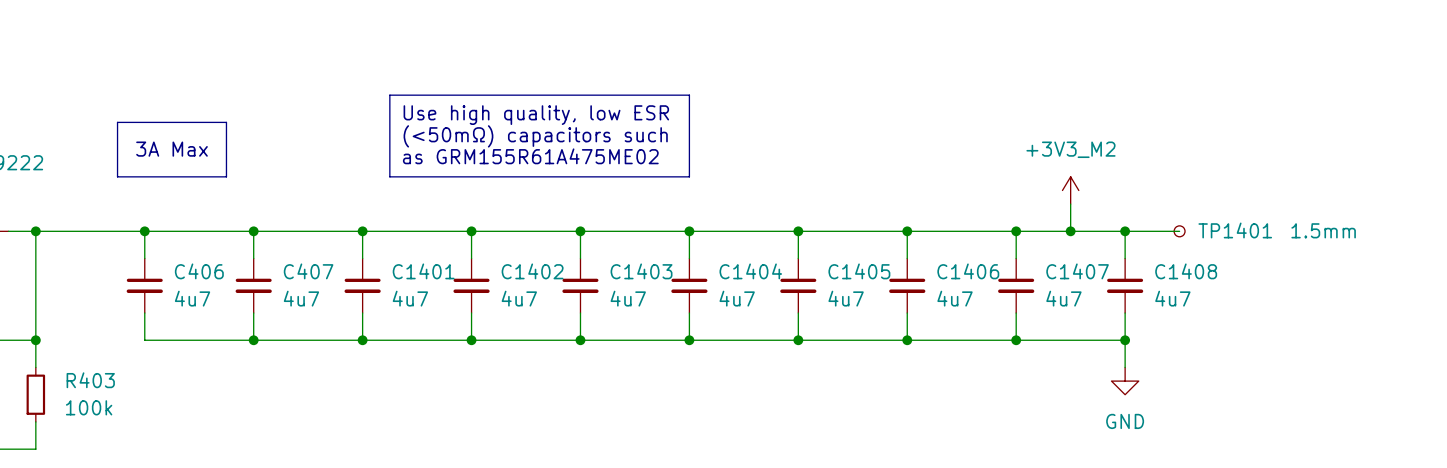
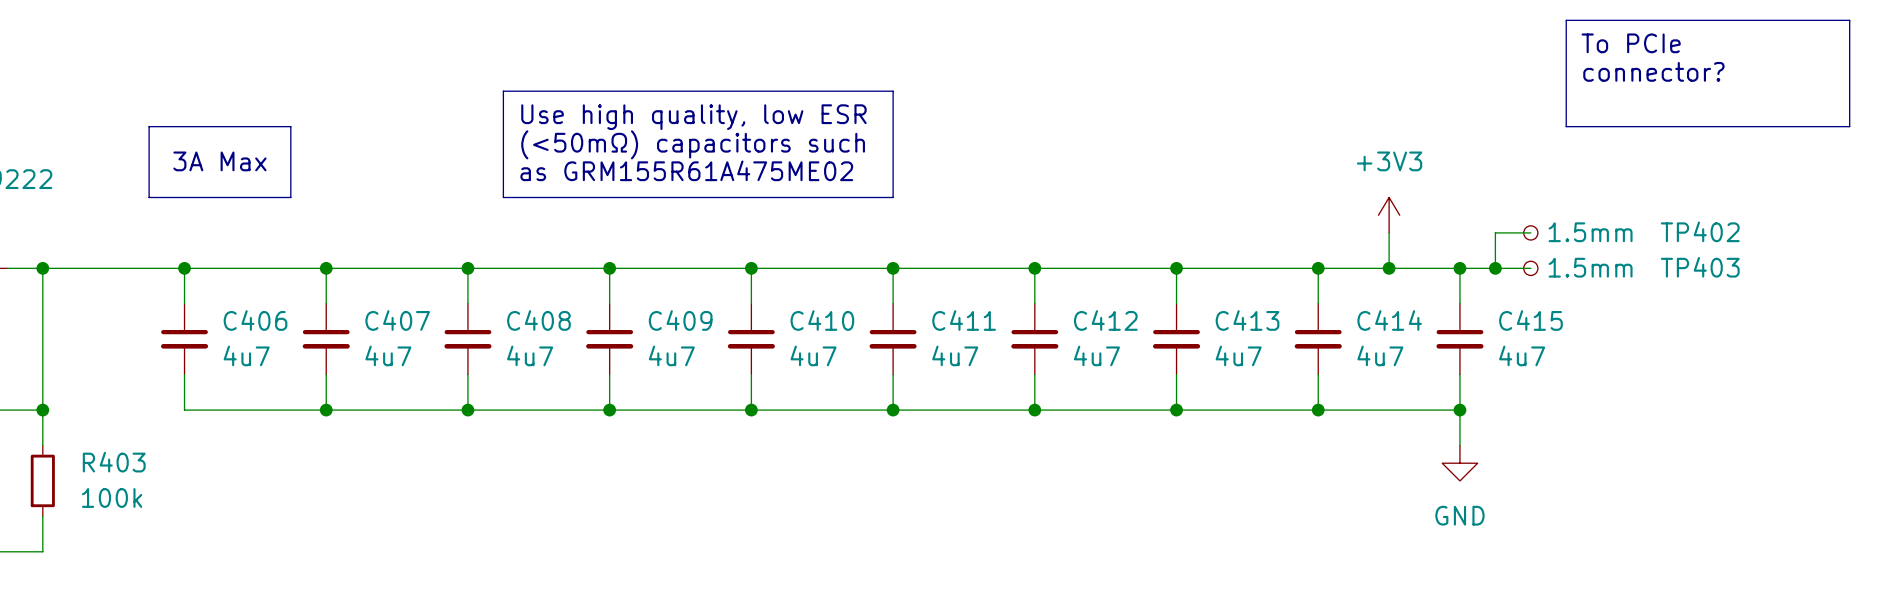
line: none -> (1566, 20) (1849, 20) (1849, 126) (1566, 126) (1566, 20)
text: none -> To PCIe (1631, 43)
text: none -> connector? (1653, 71)
power symbol: +3V3_M2 (1070, 190) -> +3V3 (1389, 215)
wire: none -> (1530, 232) (1495, 232) (1495, 268)
TP402: none -> 1.5mm (1530, 232)
TP1401 name: TP1401 (1235, 230) -> TP403 (1700, 267)
TP1401 value position: 1.5mm (1323, 230) -> 1.5mm (1590, 267)
junction: none -> (1495, 268)
C1401 name: C1401 (423, 271) -> C408 (538, 320)
C1402 name: C1402 (532, 271) -> C409 (680, 320)
C1403 name: C1403 (641, 271) -> C410 (822, 320)
C1404 name: C1404 (750, 271) -> C411 (964, 320)
C1405 name: C1405 (859, 271) -> C412 (1105, 320)
C1406 name: C1406 (968, 271) -> C413 (1247, 320)
C1407 name: C1407 (1077, 271) -> C414 (1389, 320)
C1408 name: C1408 (1186, 271) -> C415 (1530, 320)

